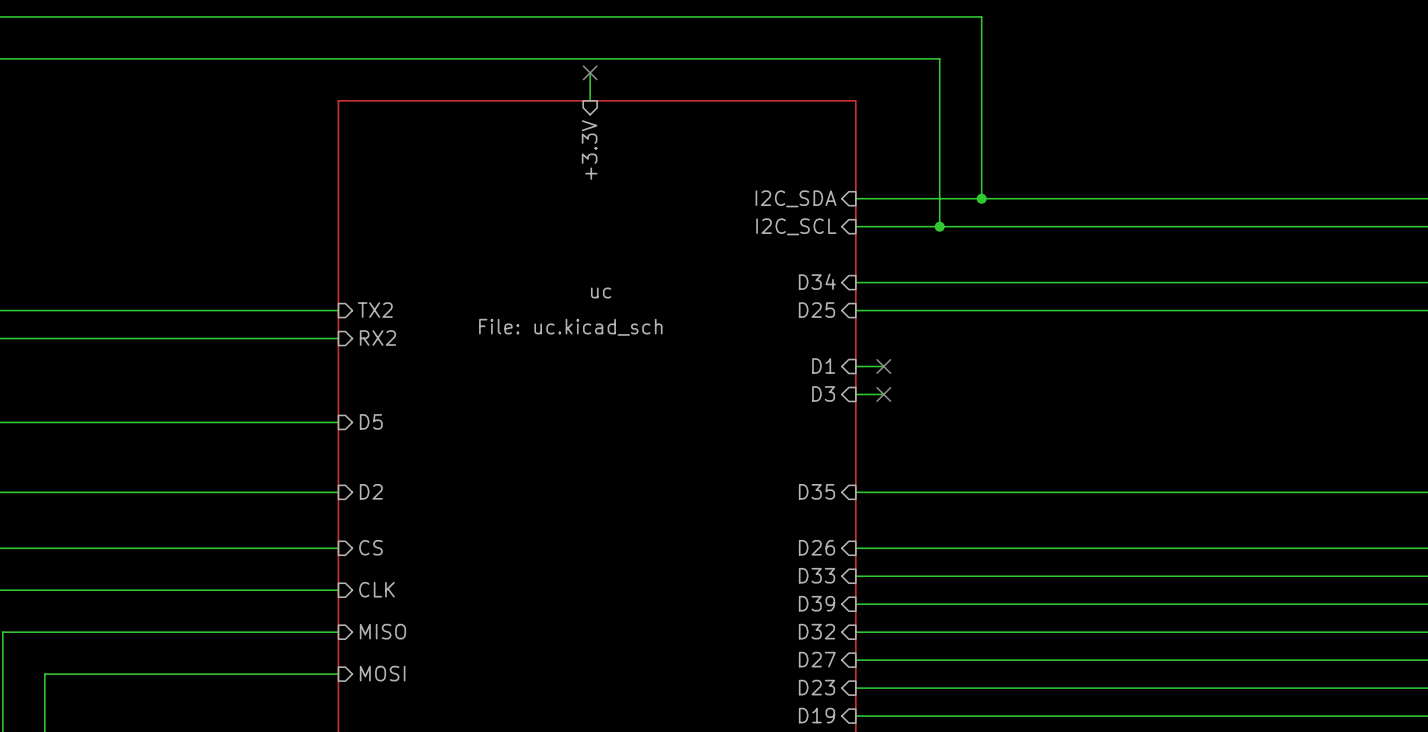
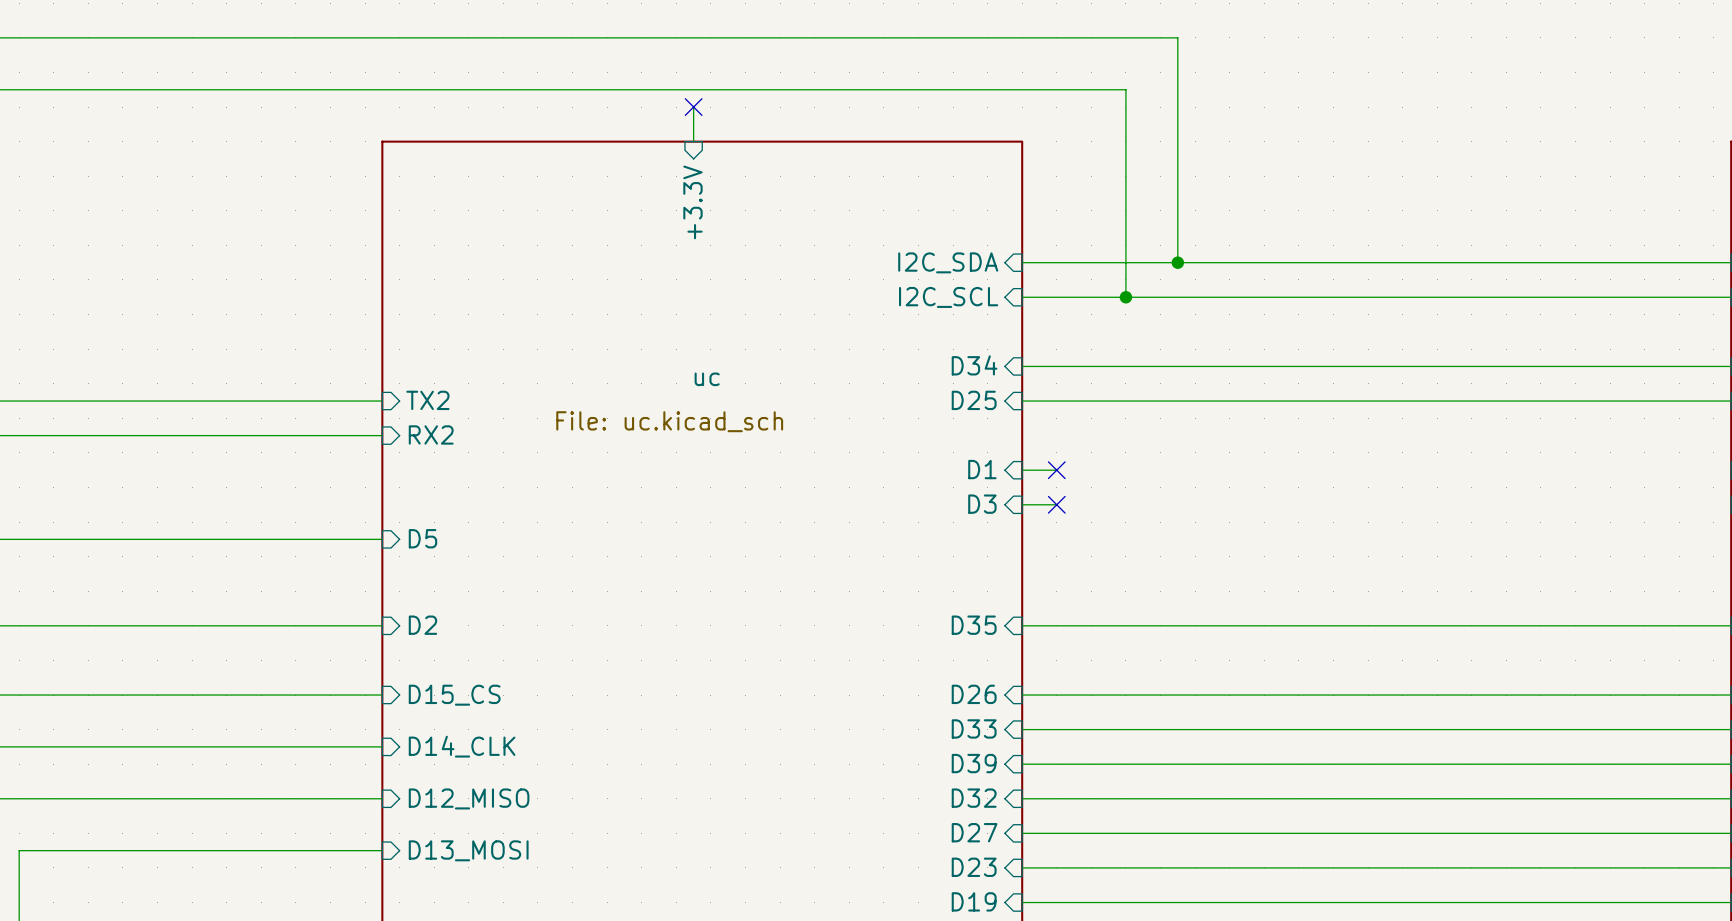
sheet pin: CS (370, 547) -> D15_CS (454, 695)
sheet pin: CLK (376, 589) -> D14_CLK (462, 746)
sheet pin: MISO (382, 631) -> D12_MISO (469, 798)
sheet pin: MOSI (382, 673) -> D13_MOSI (468, 850)

